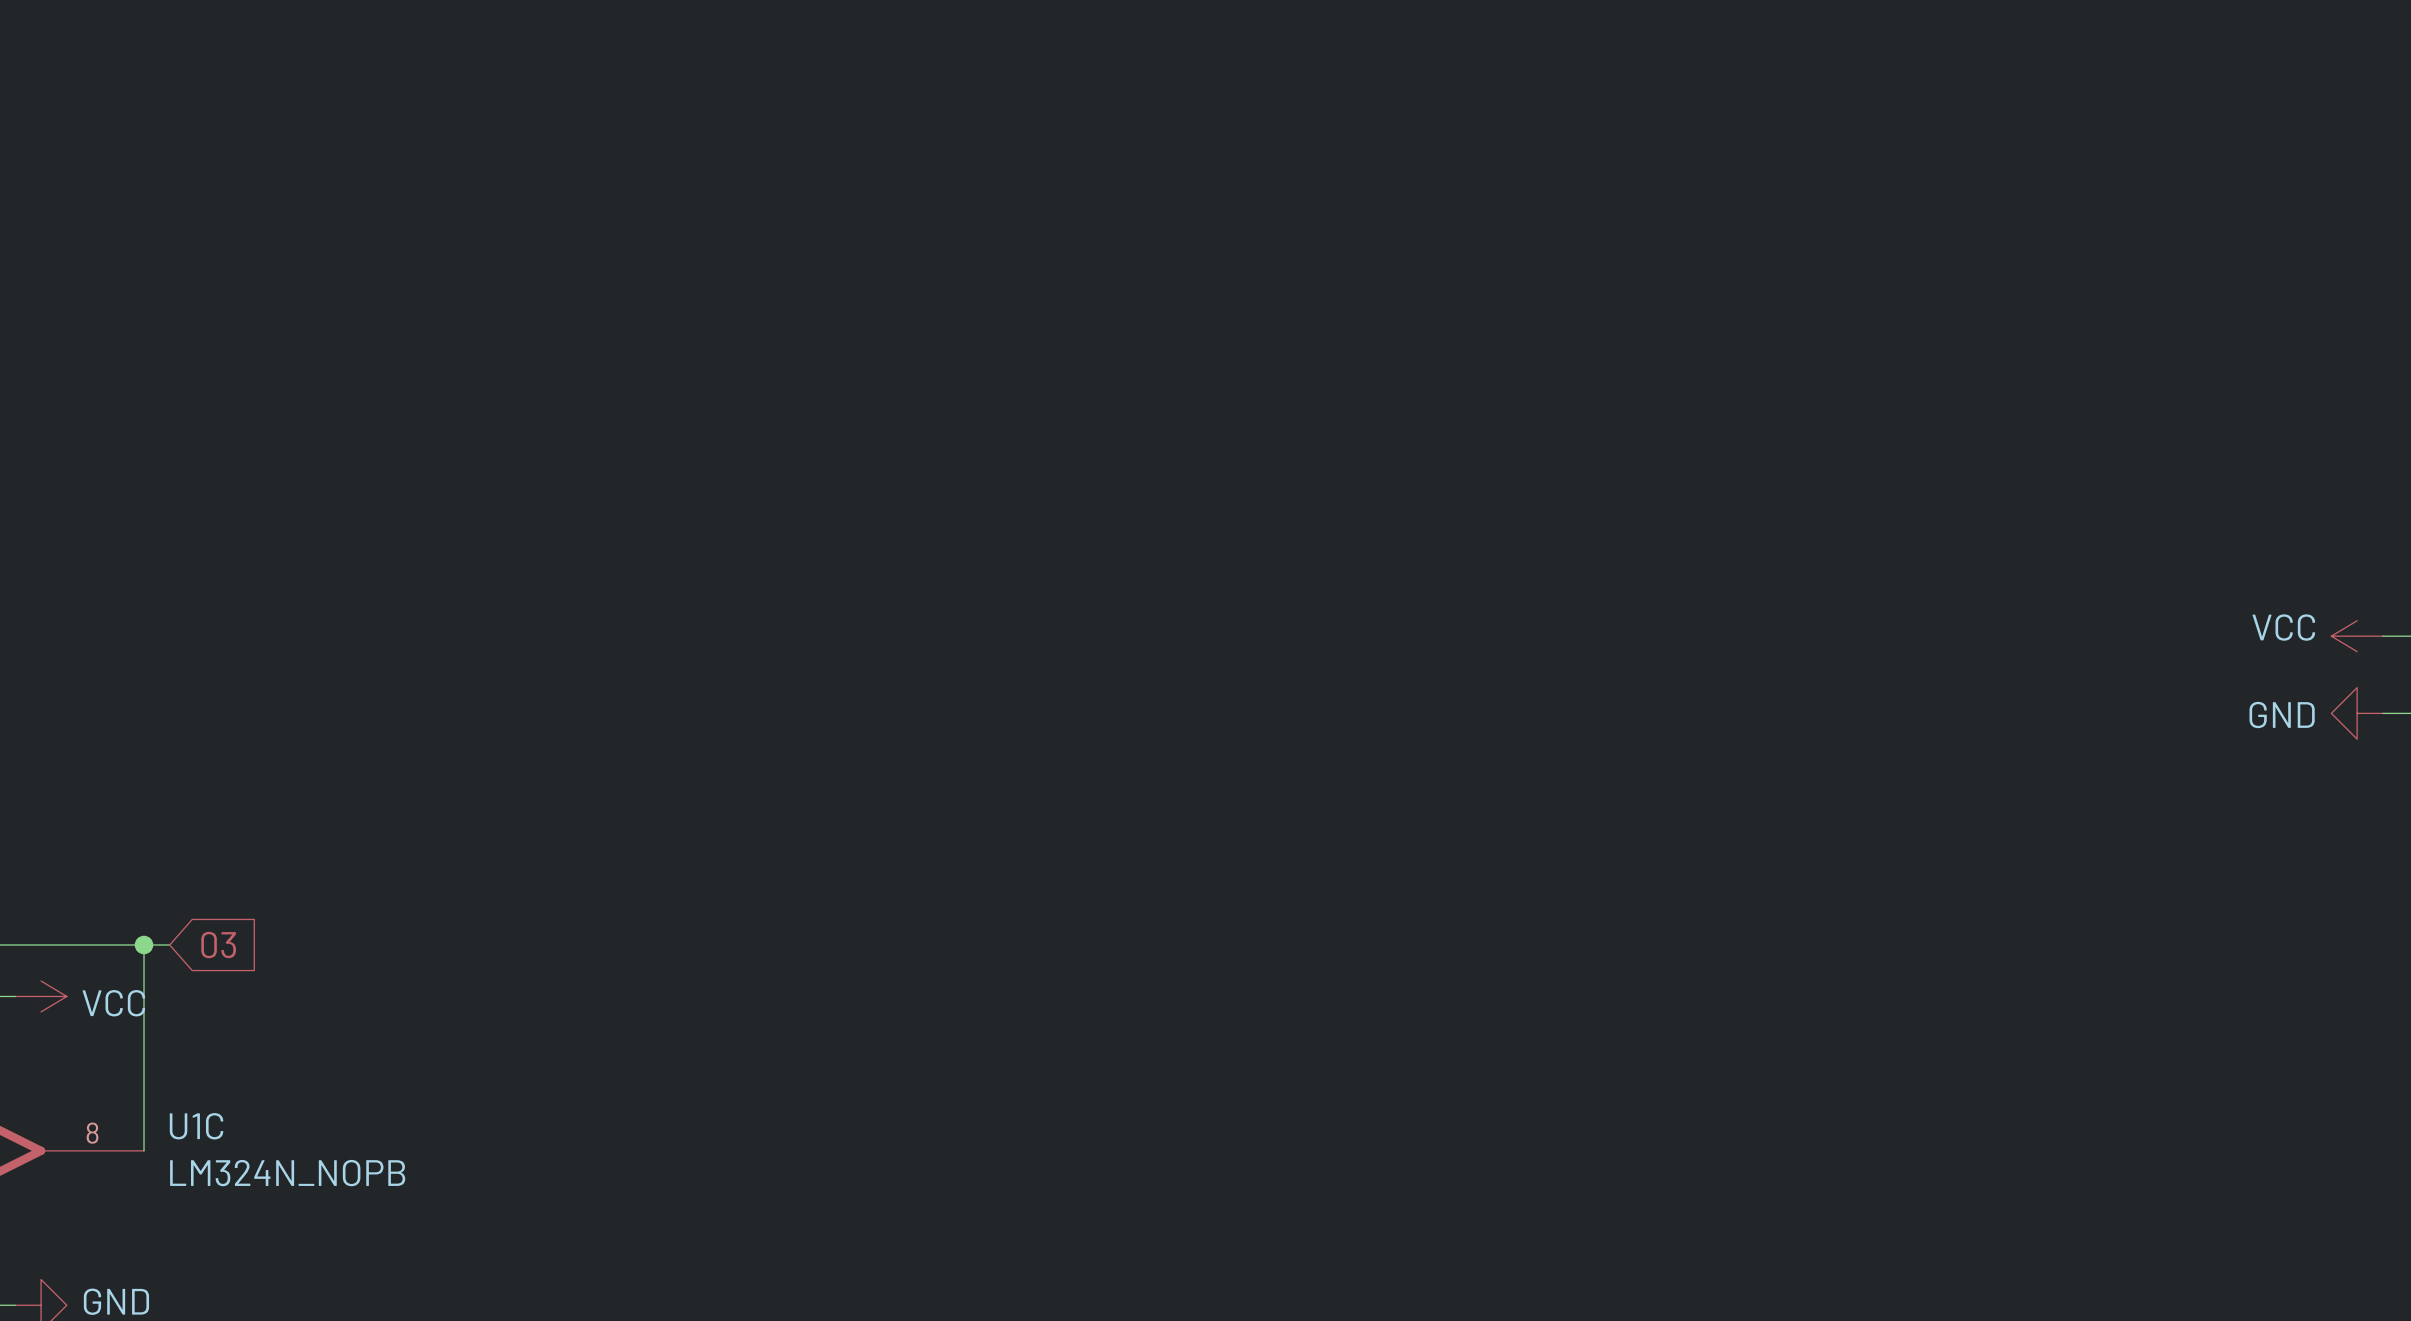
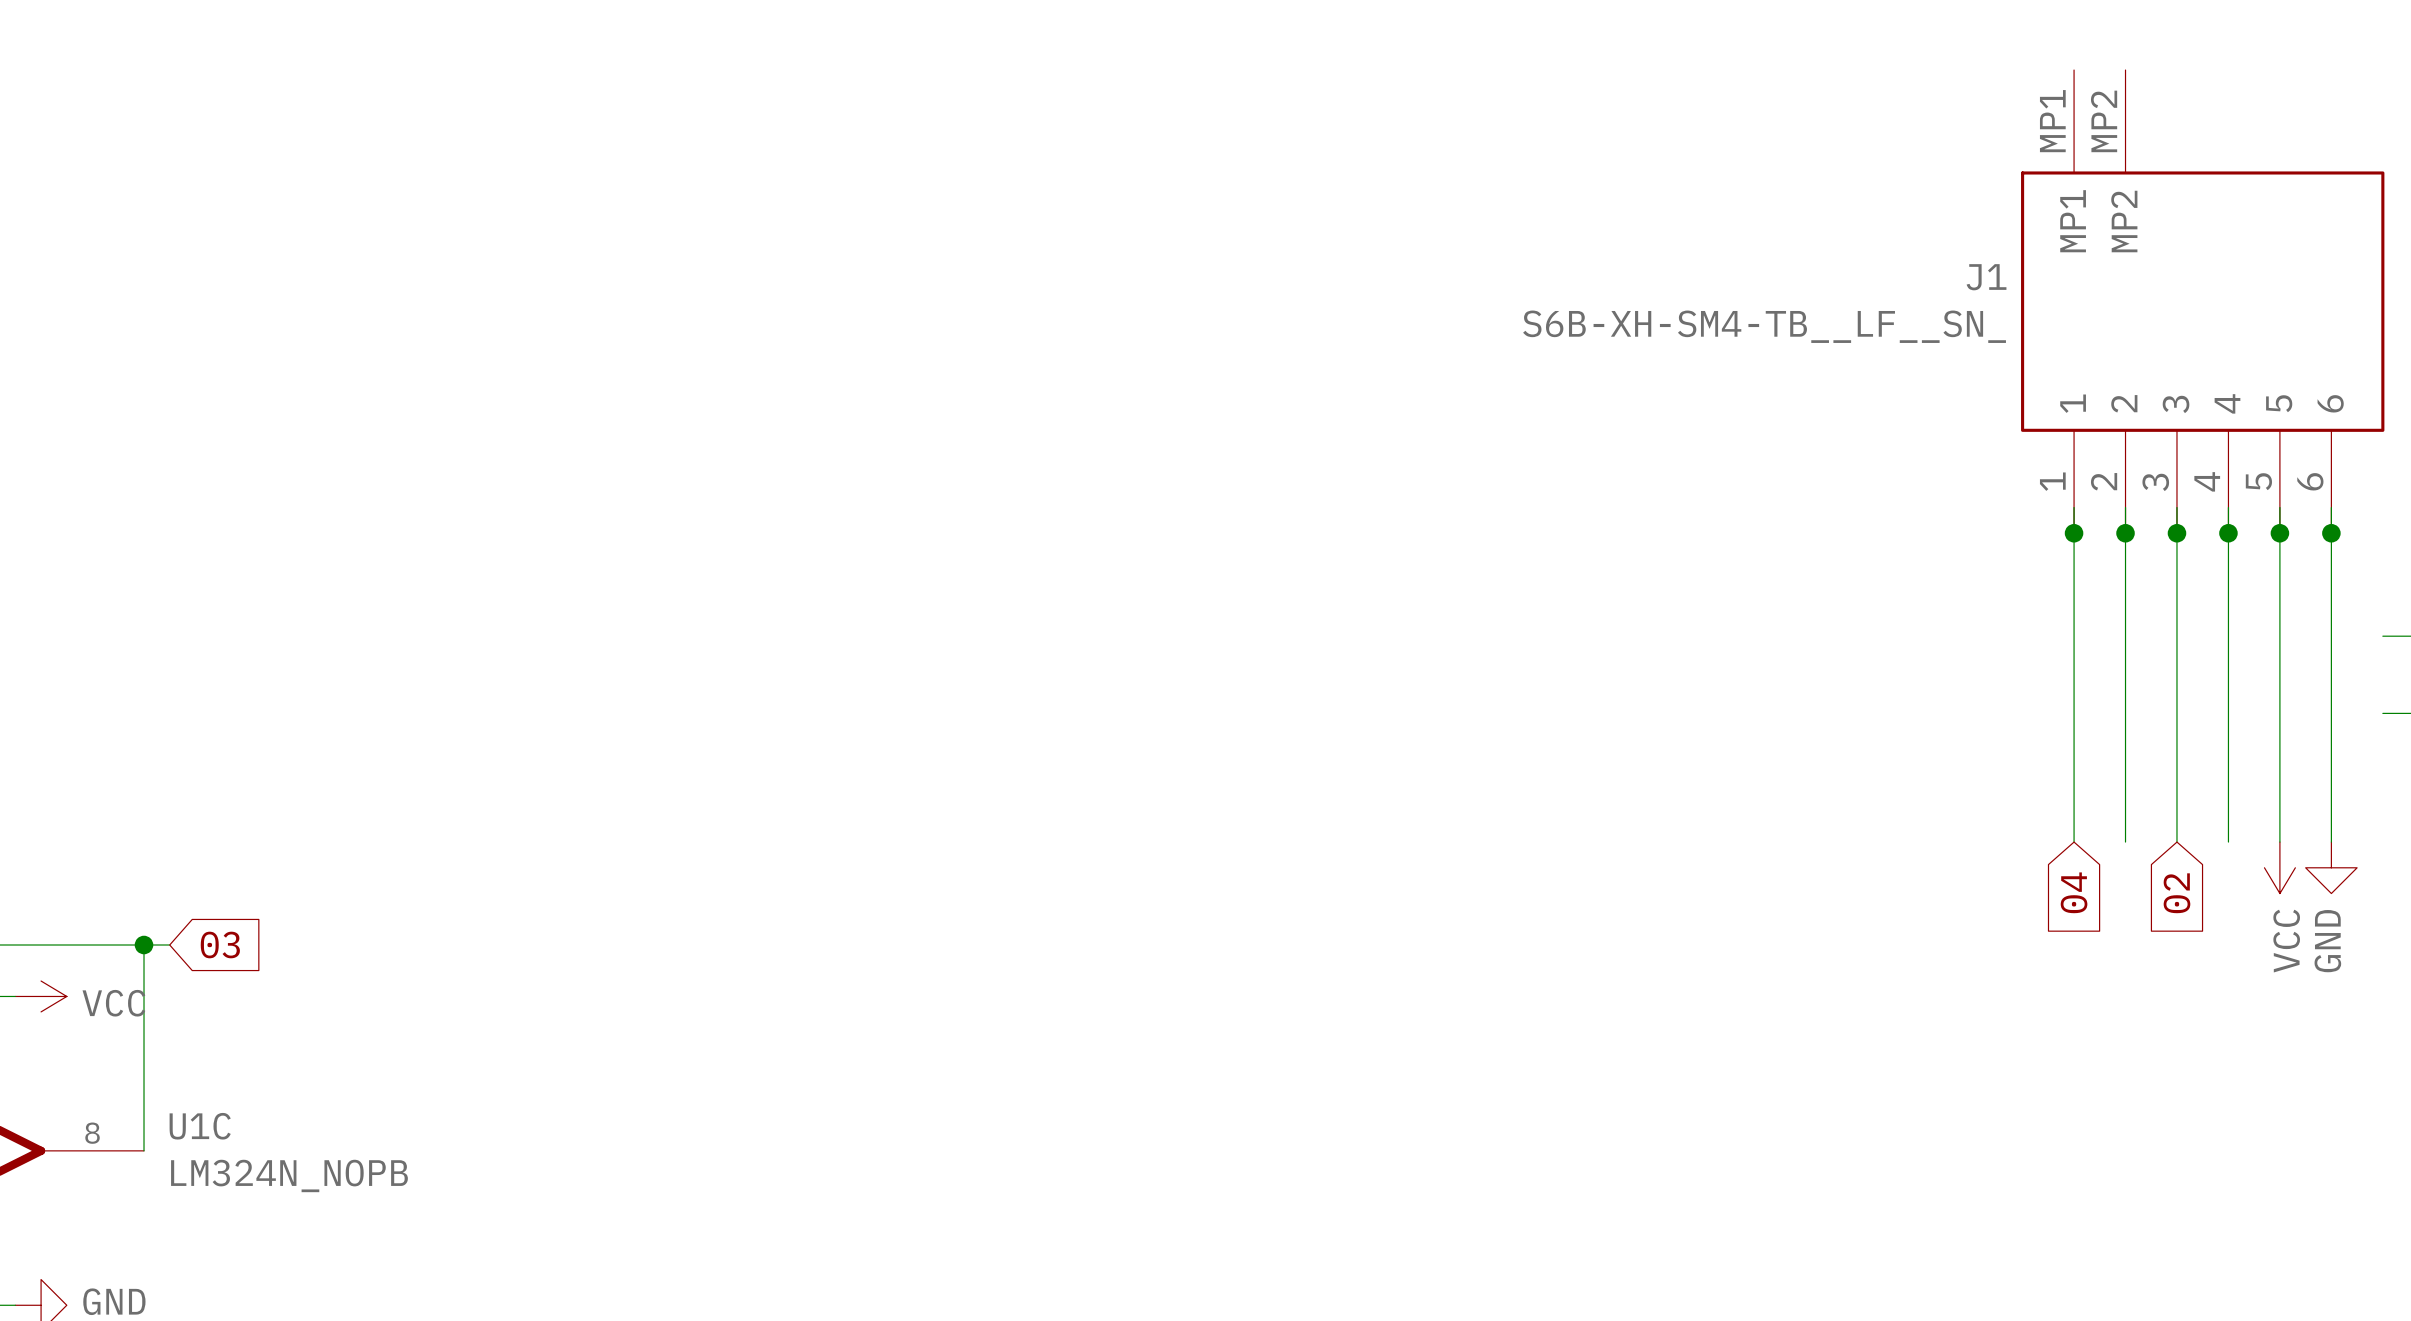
J1: none -> S6B-XH-SM4-TB__LF__SN_ (2202, 301)
wire: none -> (2074, 507) (2074, 842)
wire: none -> (2125, 507) (2125, 842)
wire: none -> (2176, 507) (2176, 842)
wire: none -> (2228, 507) (2228, 842)
wire: none -> (2279, 507) (2279, 842)
wire: none -> (2331, 507) (2331, 842)
junction: none -> (2074, 533)
junction: none -> (2125, 533)
junction: none -> (2176, 533)
junction: none -> (2228, 533)
junction: none -> (2279, 533)
junction: none -> (2331, 533)
power symbol rotation: 0° (2357, 636) -> 90° counterclockwise (2279, 867)
power symbol position: VCC (2357, 636) -> VCC (2279, 867)
power symbol rotation: 0° (2357, 713) -> 90° counterclockwise (2331, 867)
power symbol position: GND (2357, 713) -> GND (2331, 867)
global label: none -> 04 (2074, 892)
global label: none -> 02 (2176, 893)

